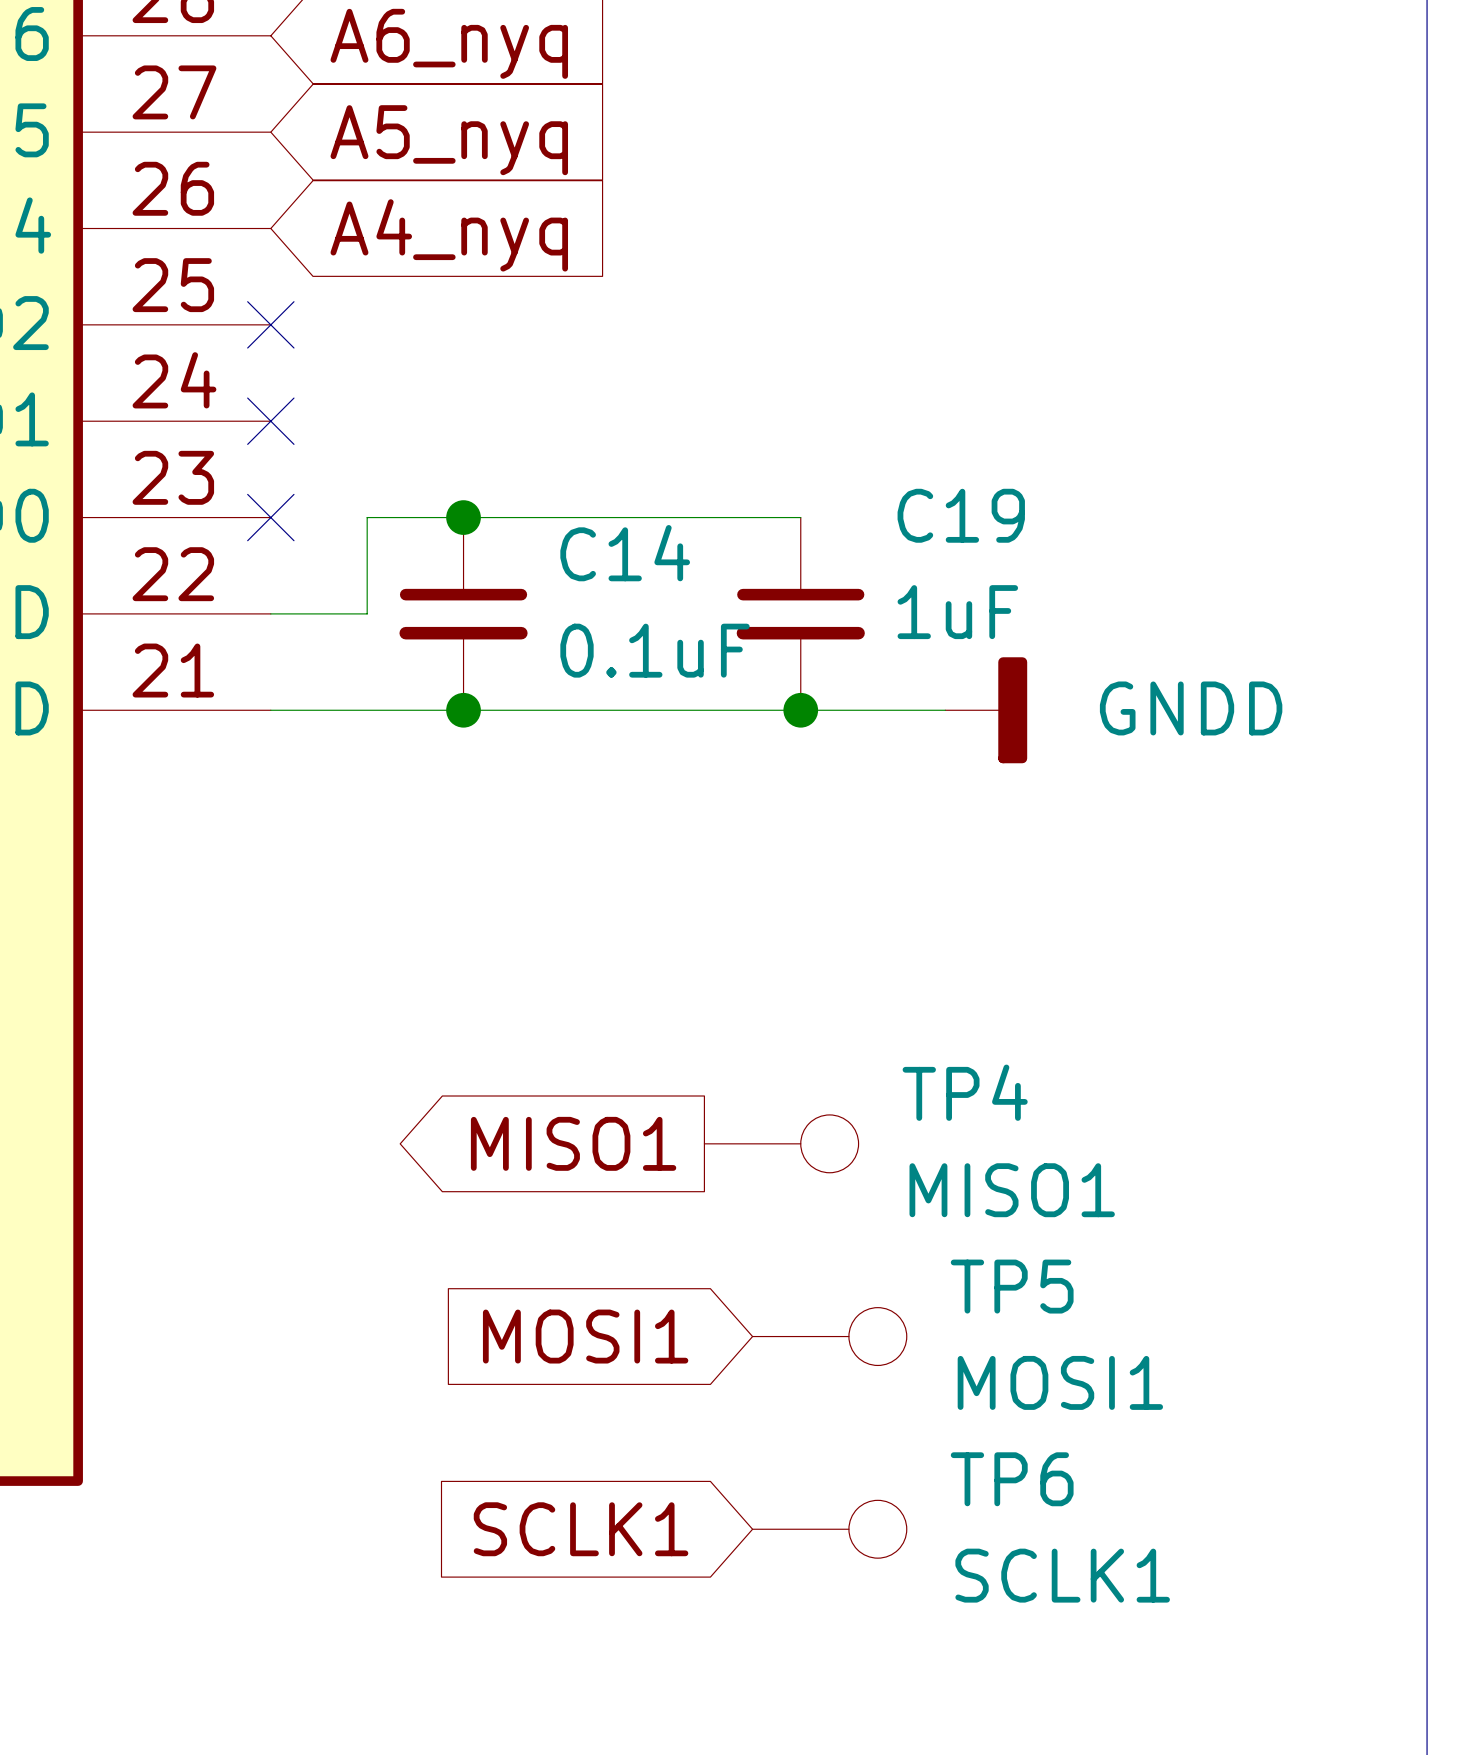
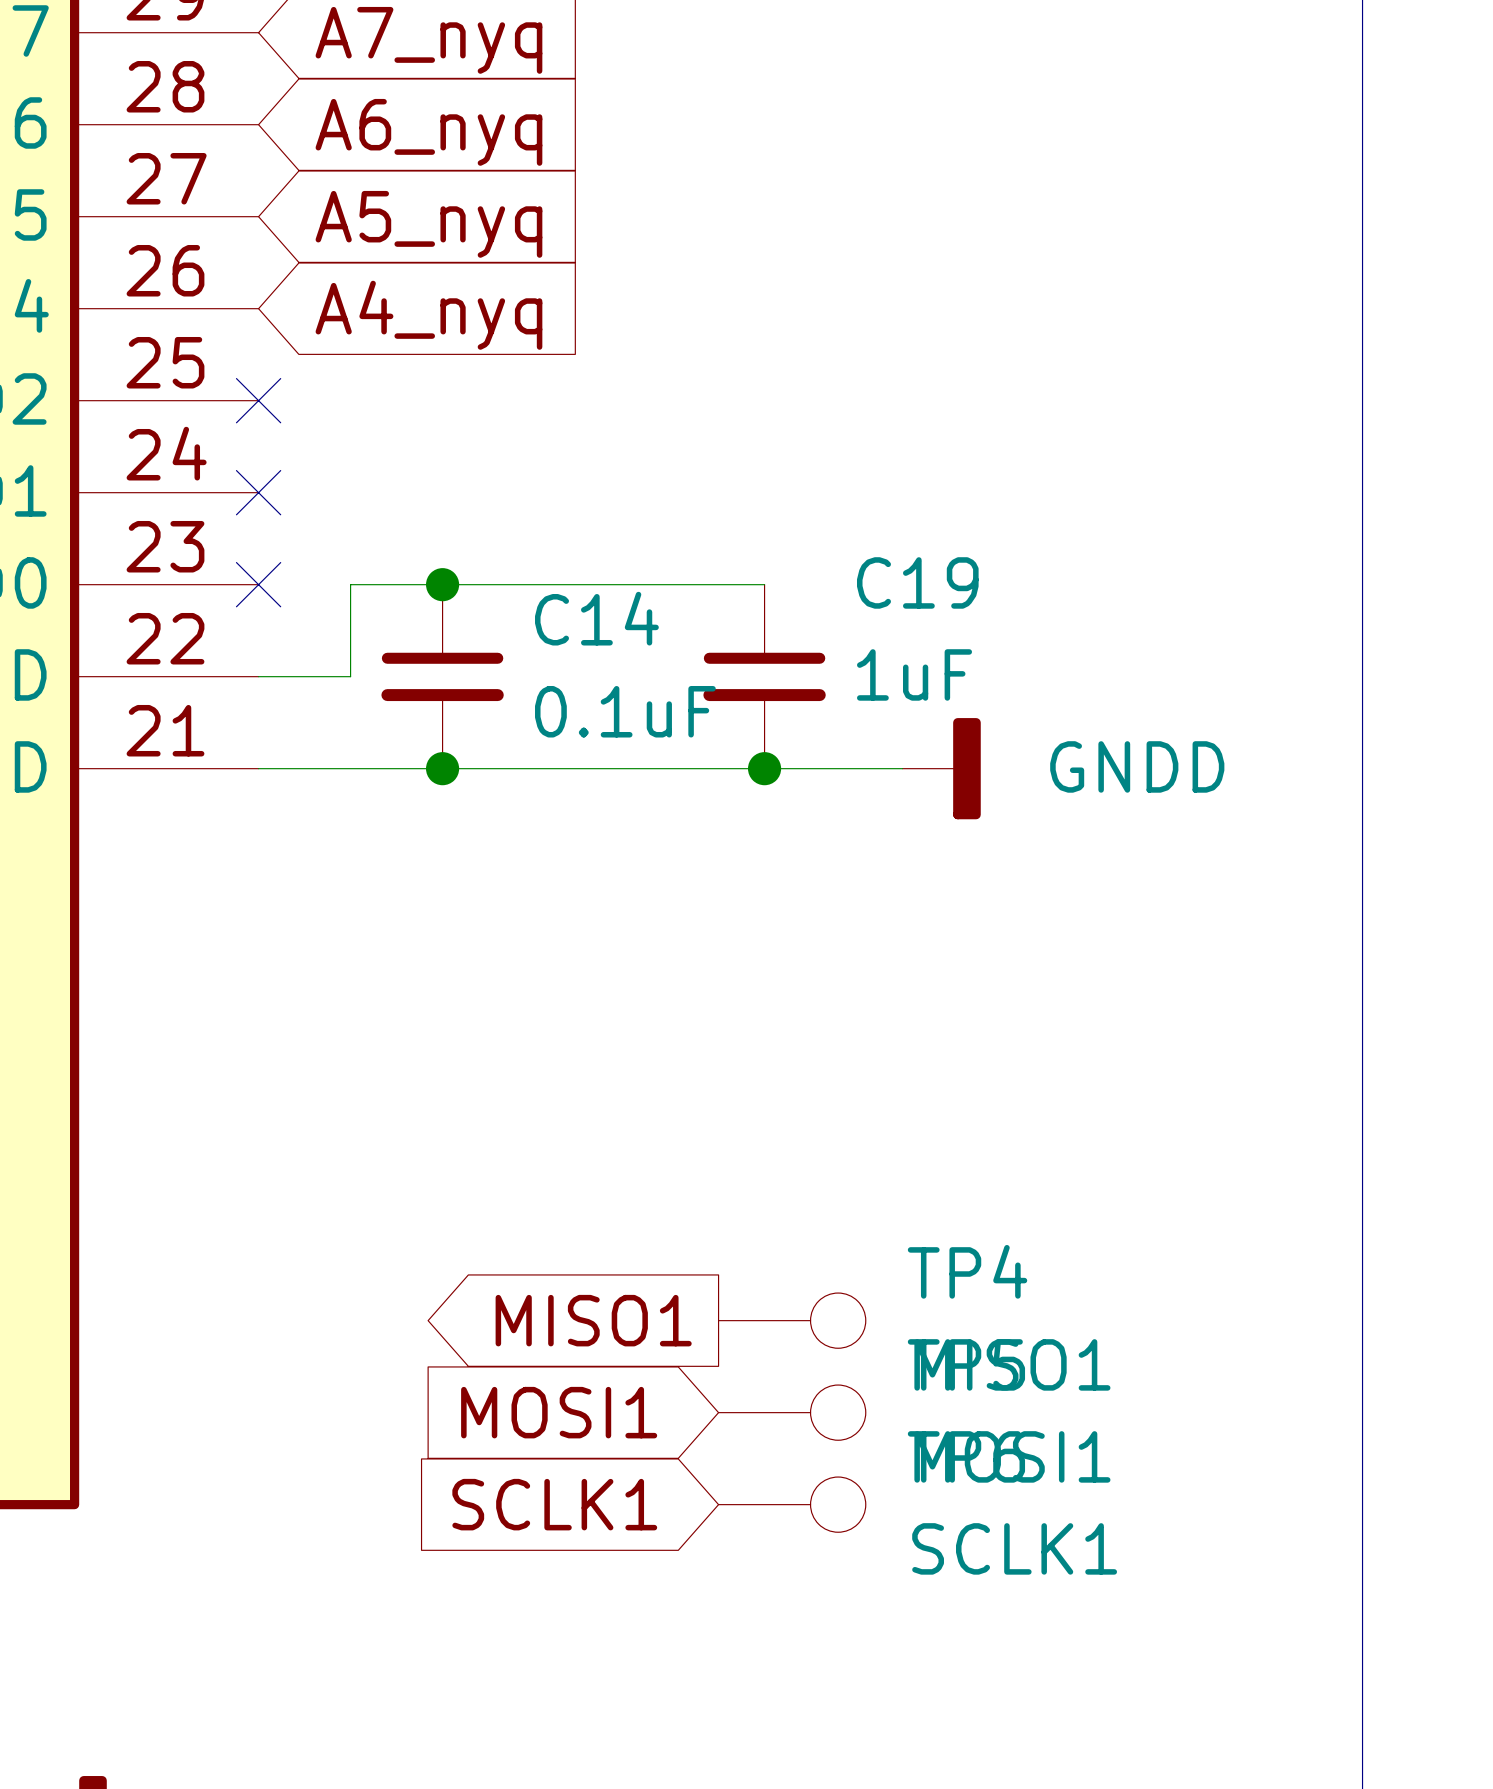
global label position: MISO1 (573, 1143) -> MISO1 (593, 1320)
TP4 position: (781, 1143) -> (792, 1320)
global label position: MOSI1 (585, 1336) -> MOSI1 (559, 1412)
TP5 position: (829, 1336) -> (792, 1412)
global label position: SCLK1 (581, 1529) -> SCLK1 (554, 1504)
TP6 position: (829, 1529) -> (792, 1504)

